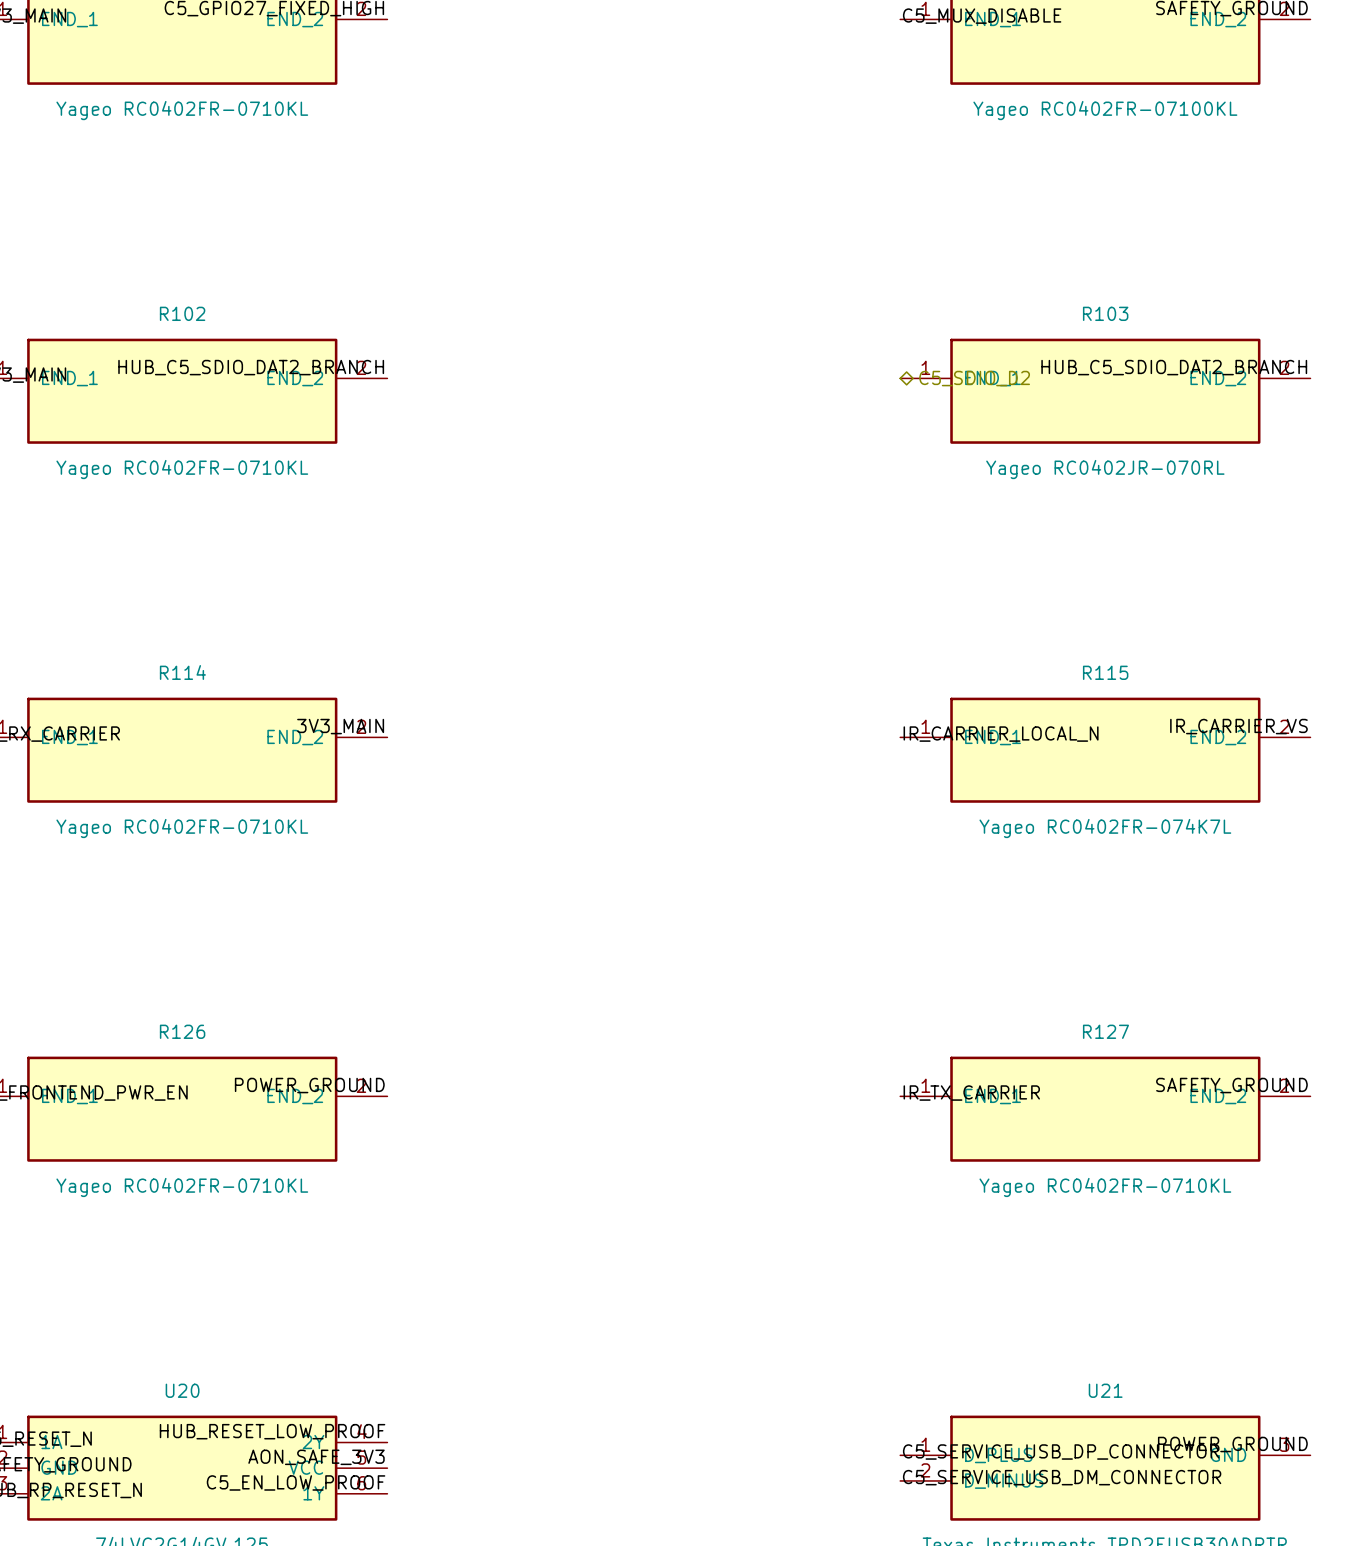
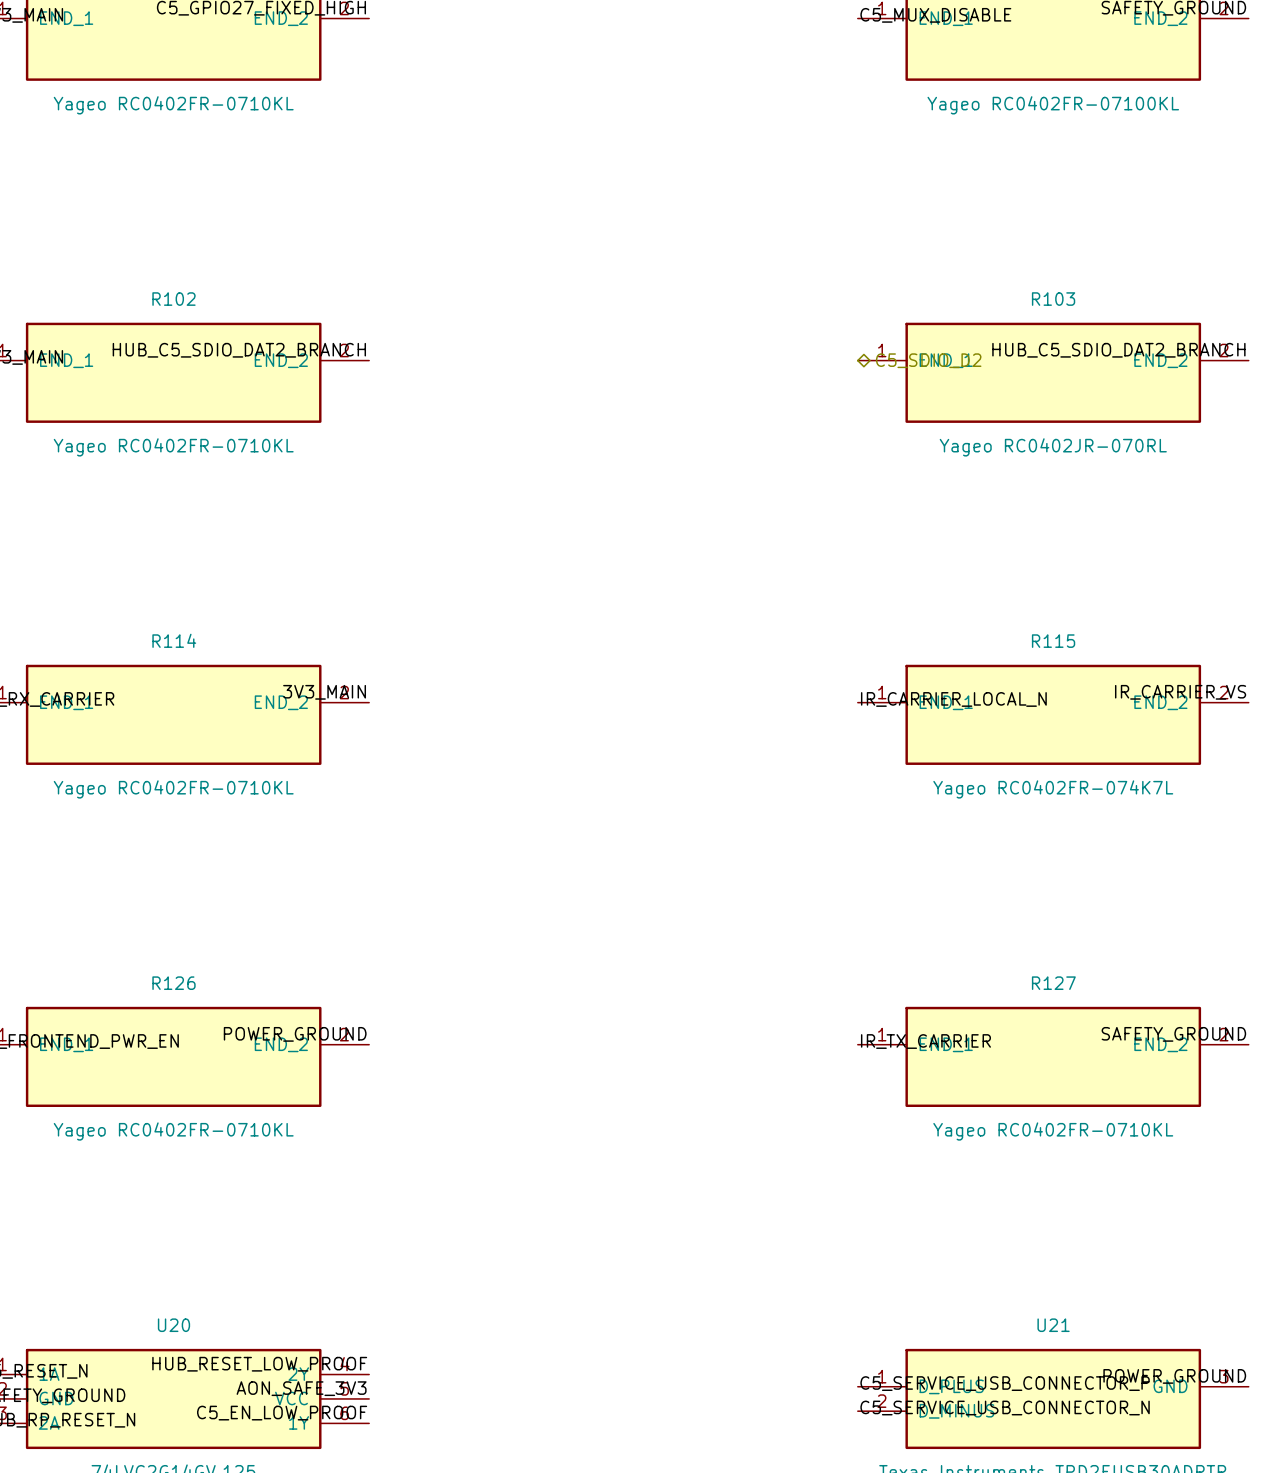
label: C5_SERVICE_USB_DP_CONNECTOR (1061, 1452) -> C5_SERVICE_USB_CONNECTOR_P (1005, 1383)
label: C5_SERVICE_USB_DM_CONNECTOR (1062, 1477) -> C5_SERVICE_USB_CONNECTOR_N (1005, 1408)

